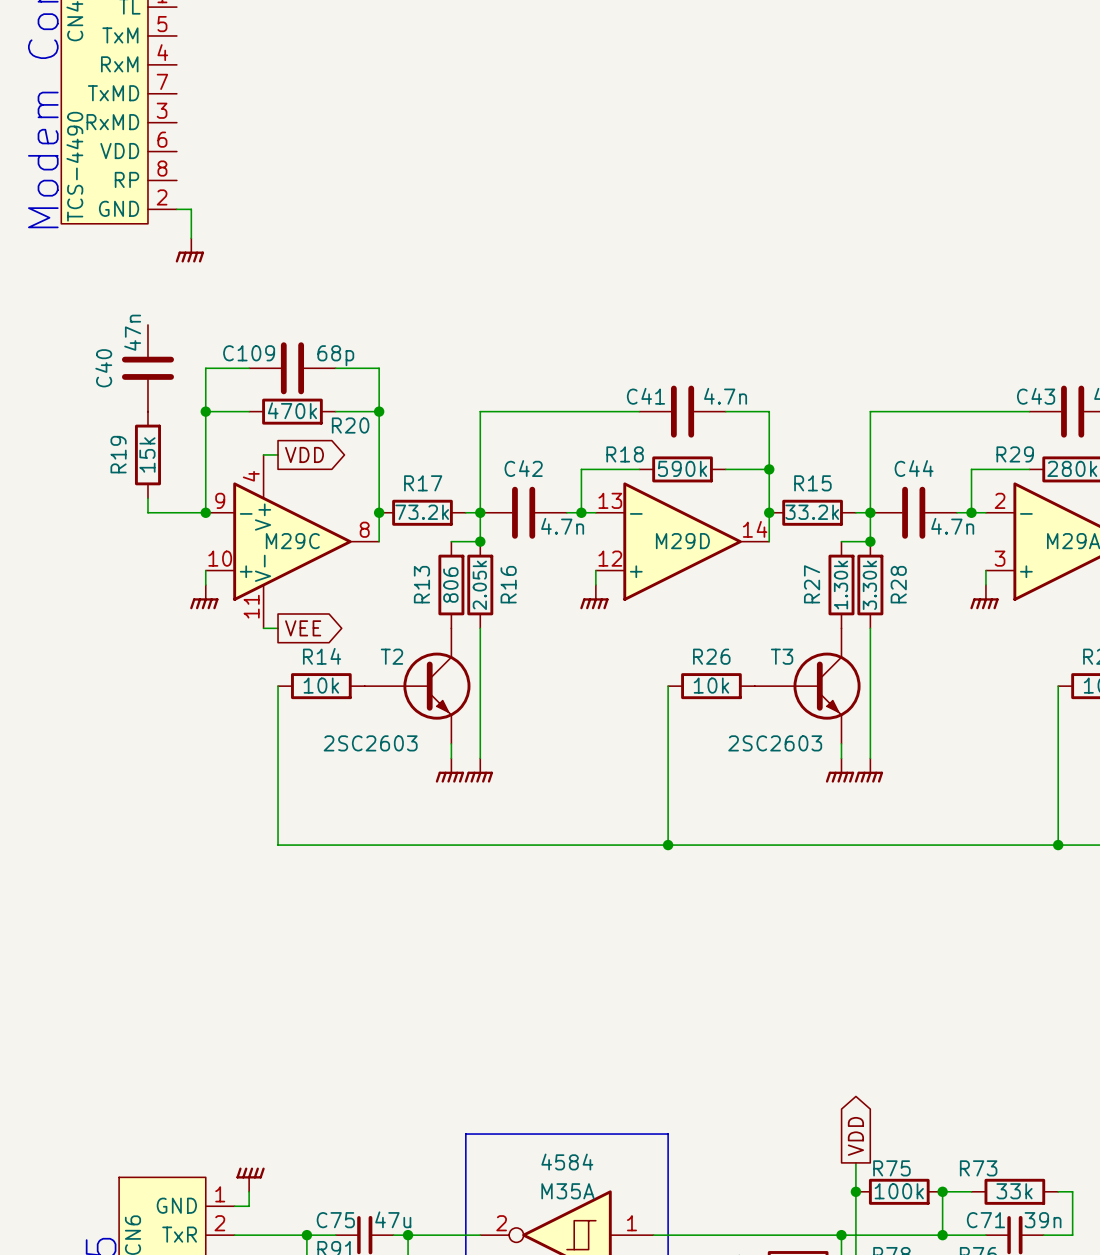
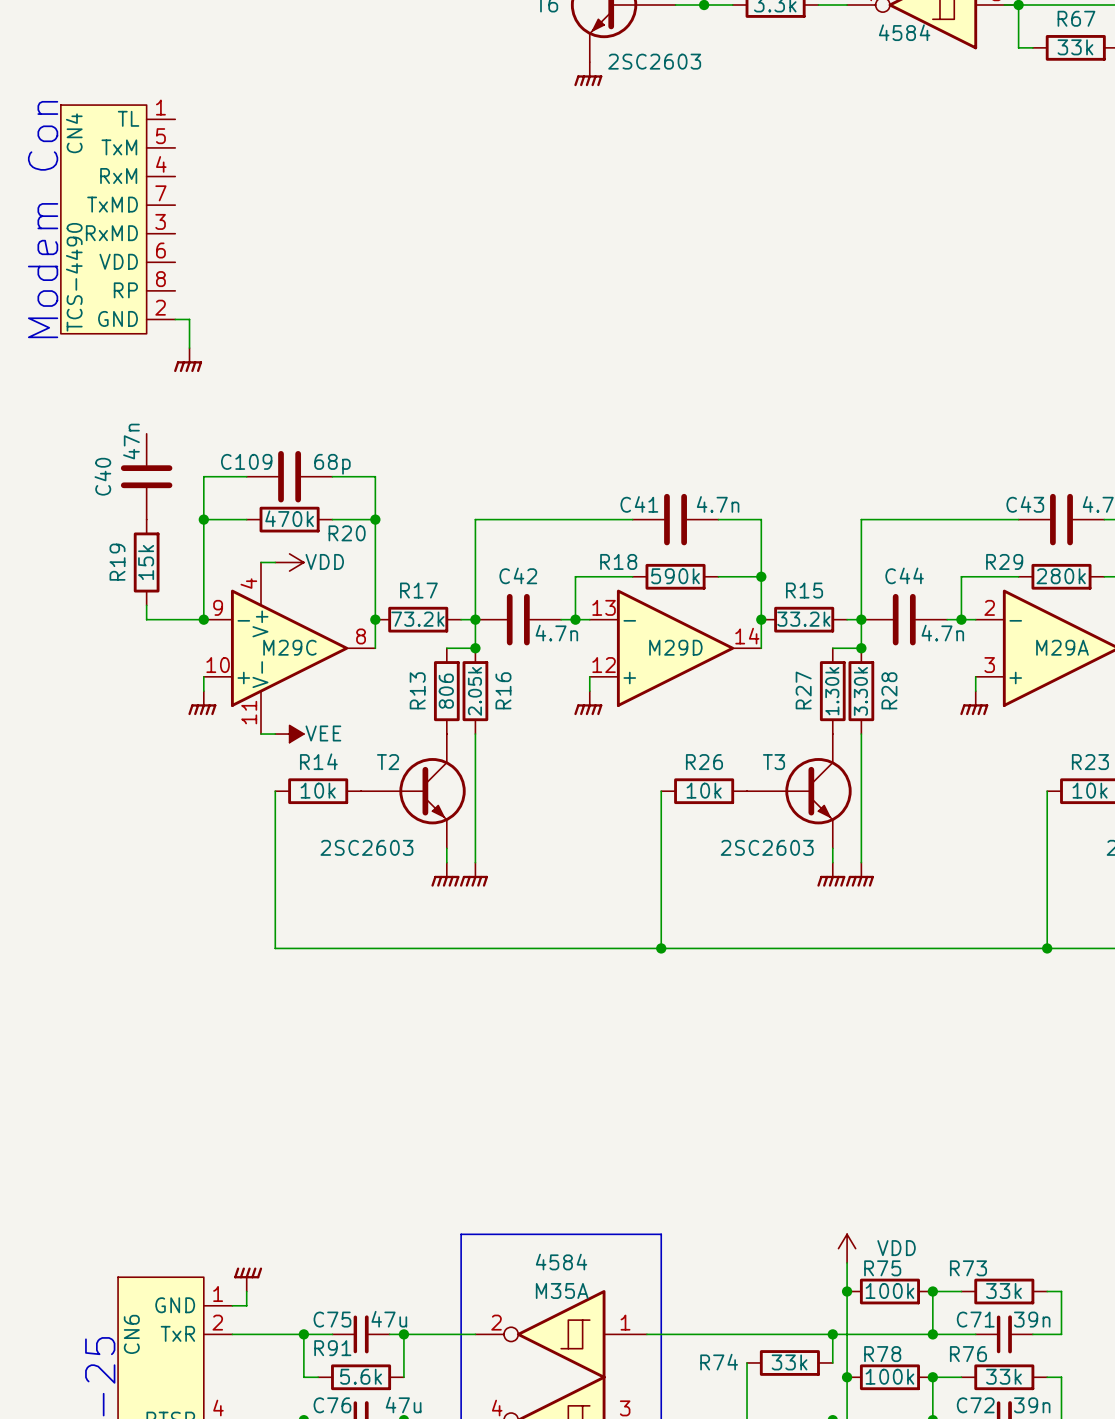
power symbol: none -> VDD (289, 562)
global label: VDD (304, 454) -> none
power symbol: none -> VEE (289, 734)
global label: VEE (303, 628) -> none
global label: VDD (855, 1136) -> none
power symbol: none -> VDD (847, 1248)

